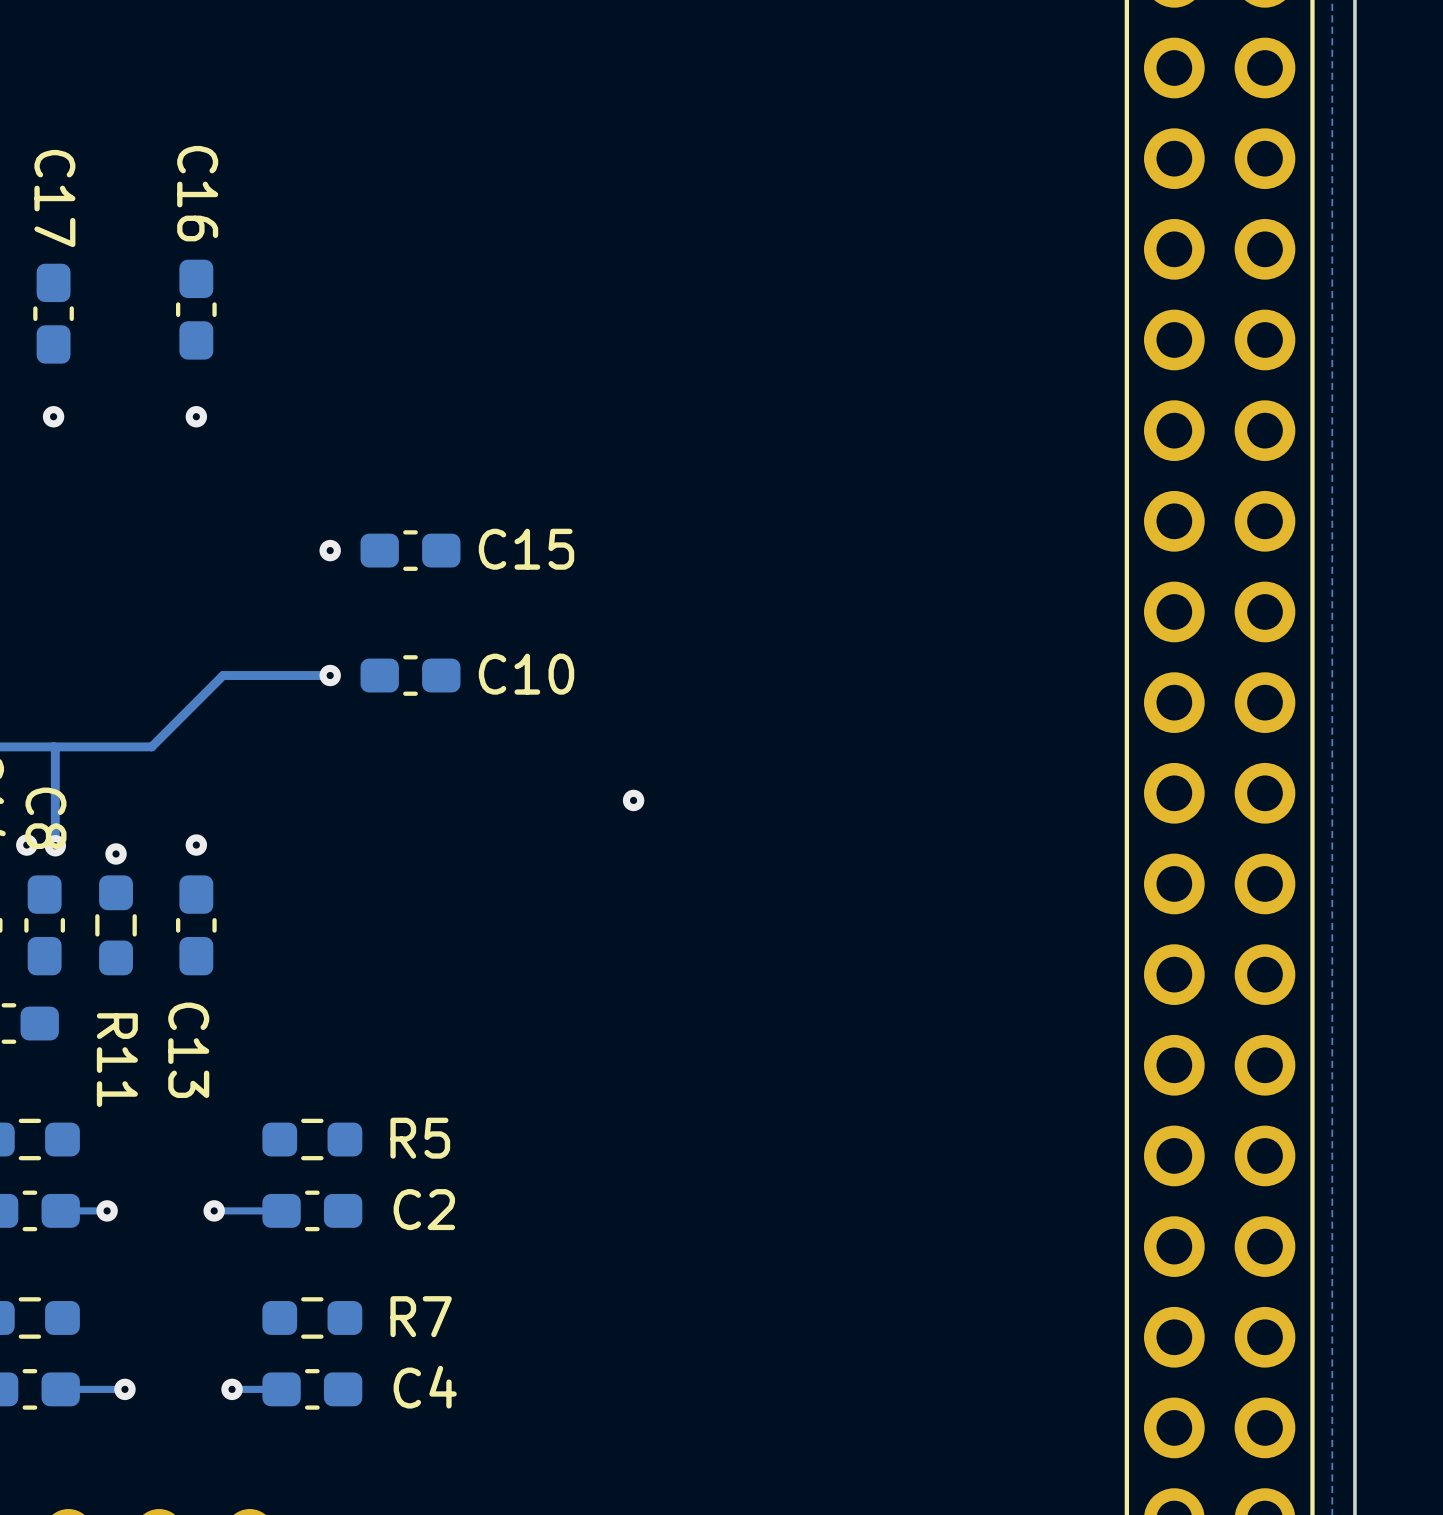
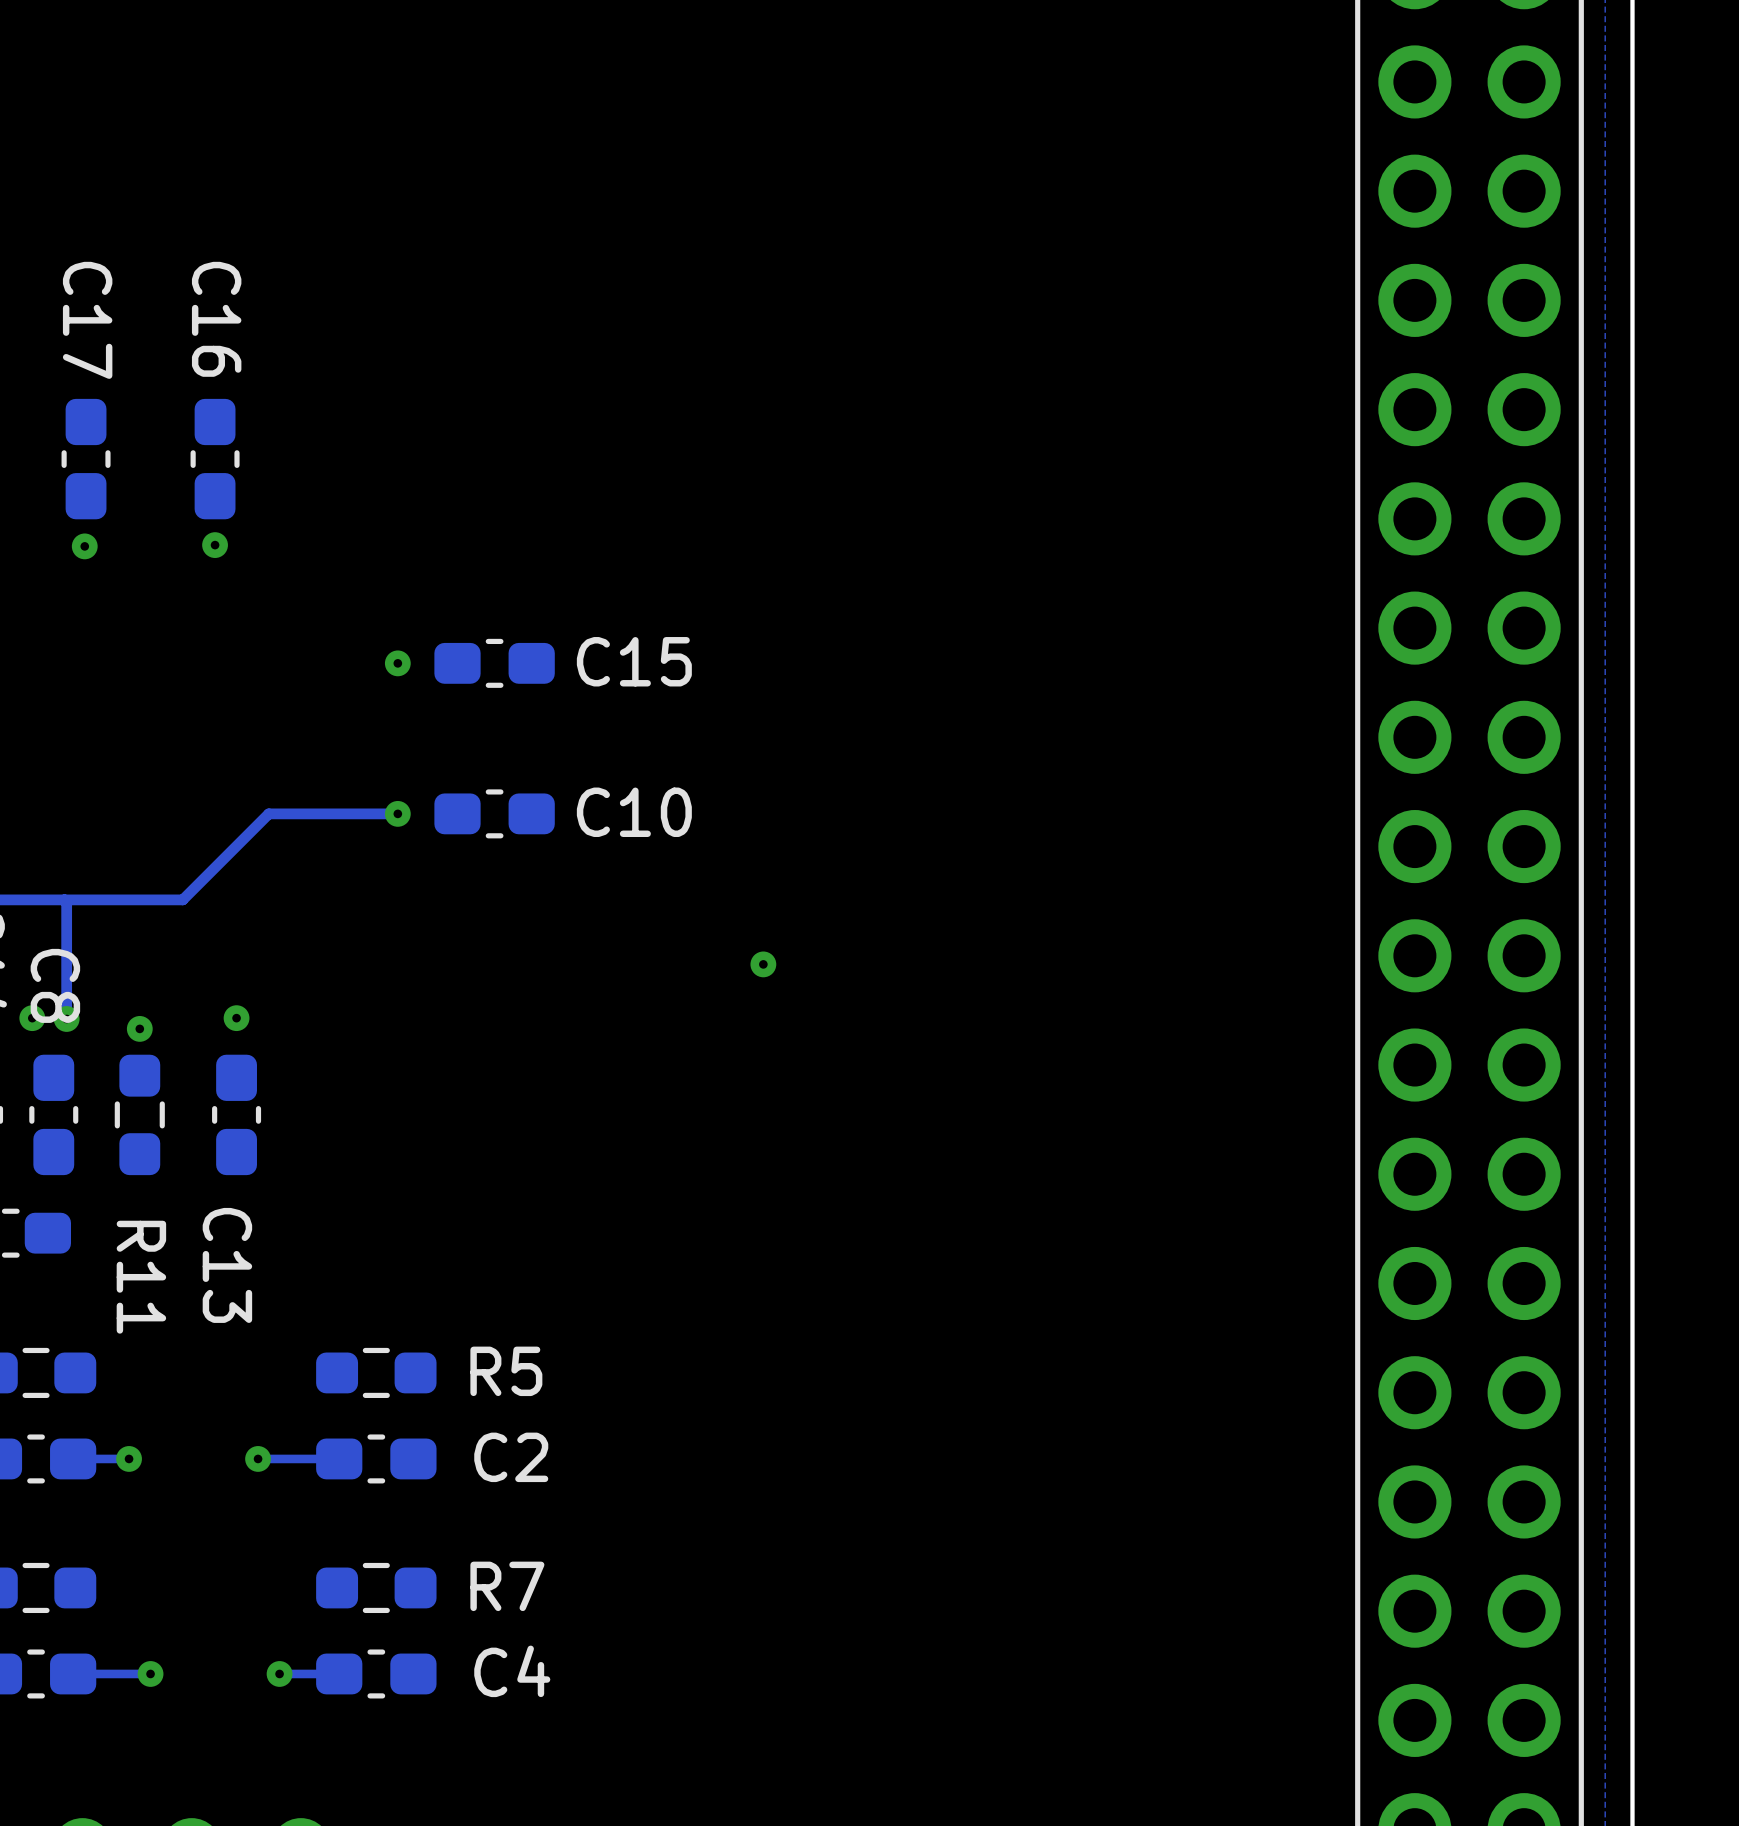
C16 position: (196, 309) -> (215, 459)
C17 position: (53, 313) -> (86, 459)
via position: (53, 416) -> (84, 546)
via position: (196, 416) -> (215, 545)

